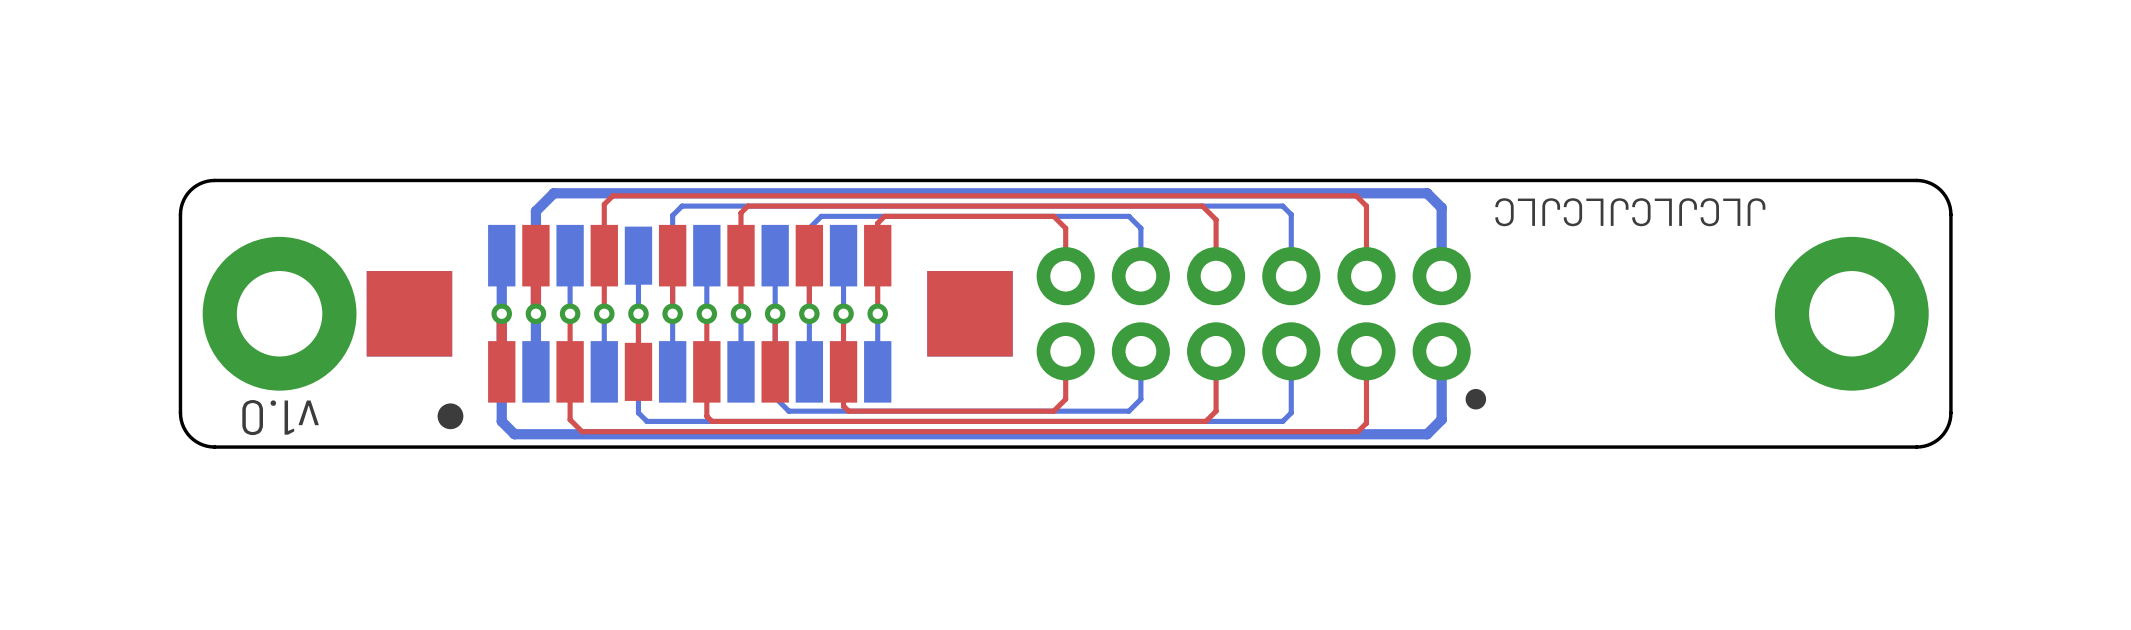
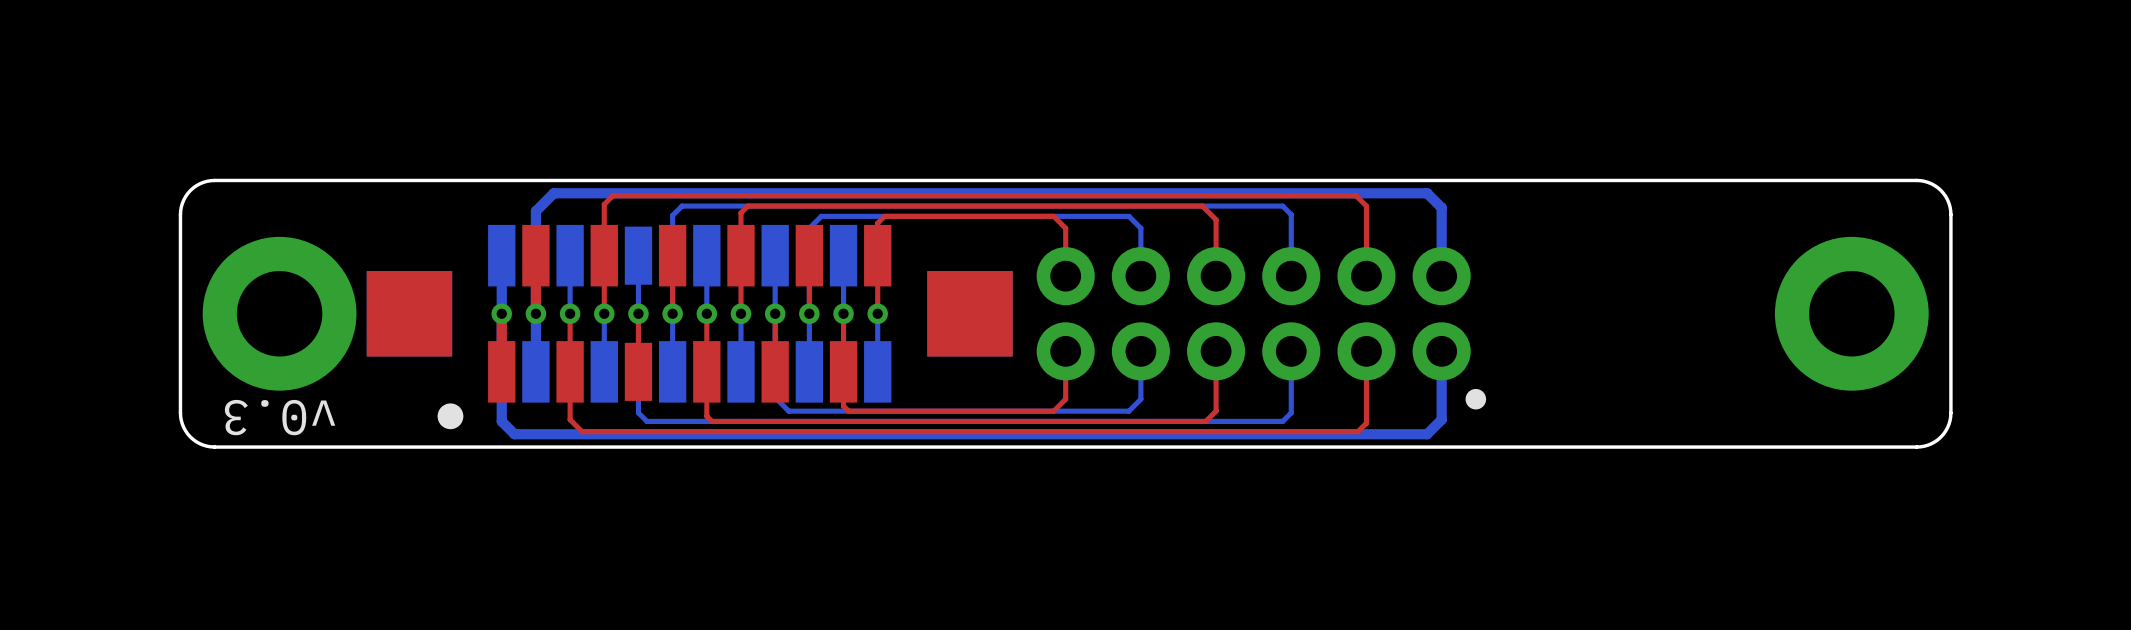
text: JLCJLCJLCJLC (1630, 212) -> none
text: v1.0 (280, 417) -> v0.3 (280, 417)

